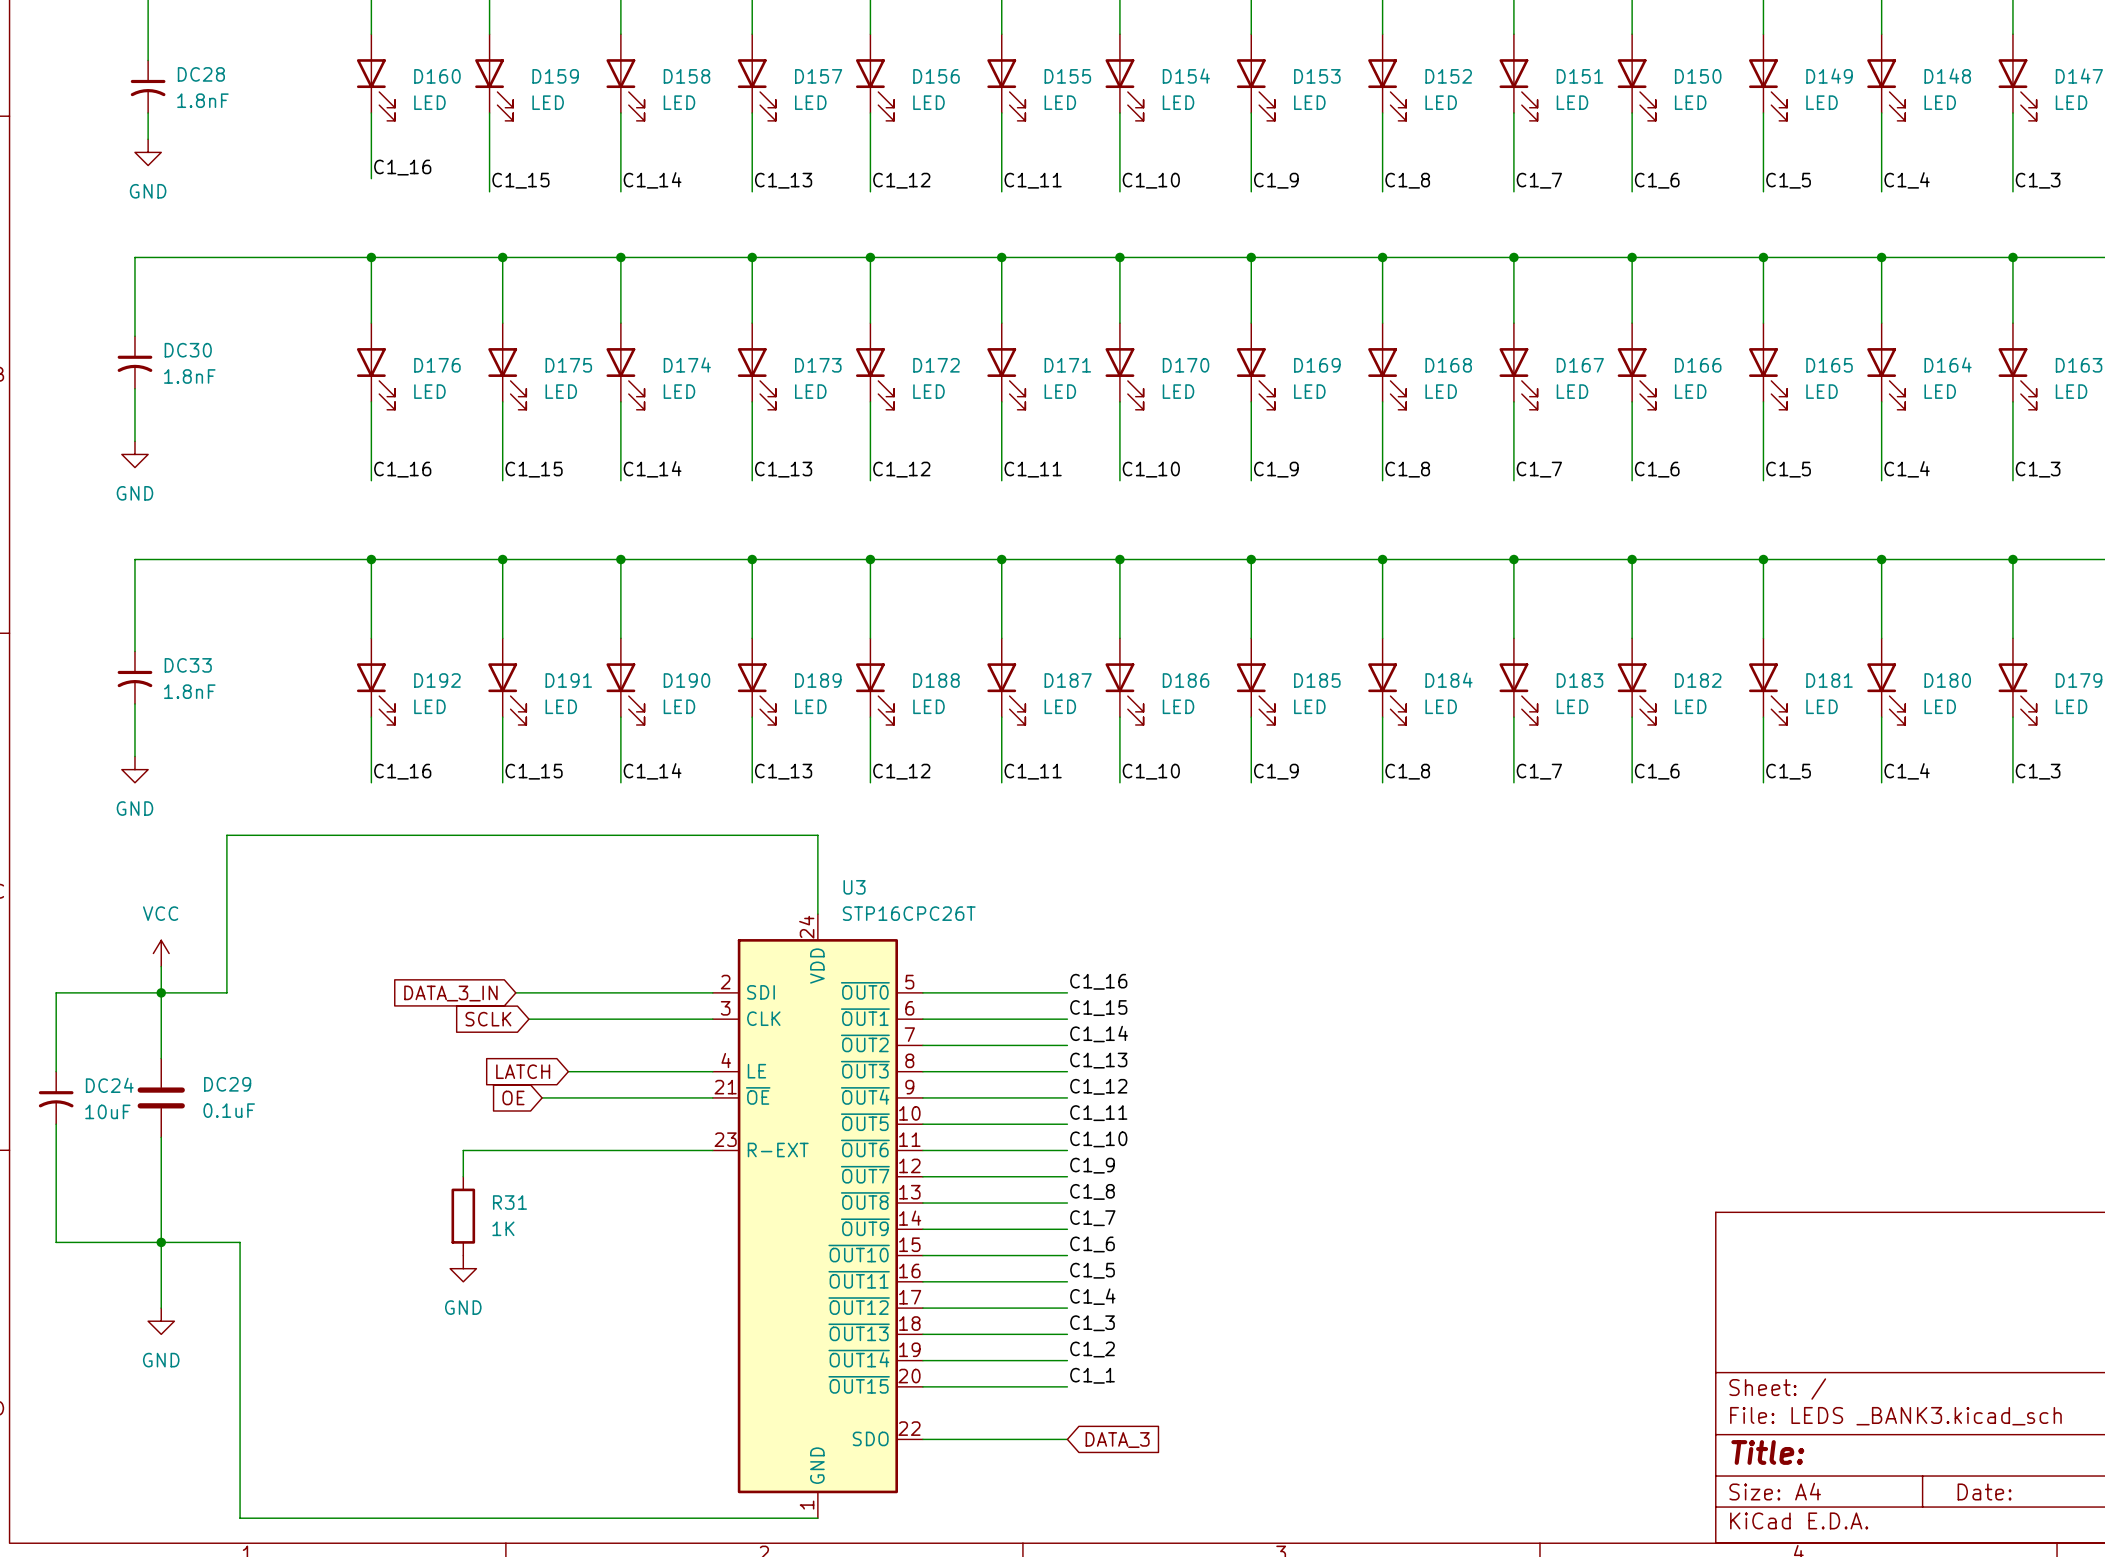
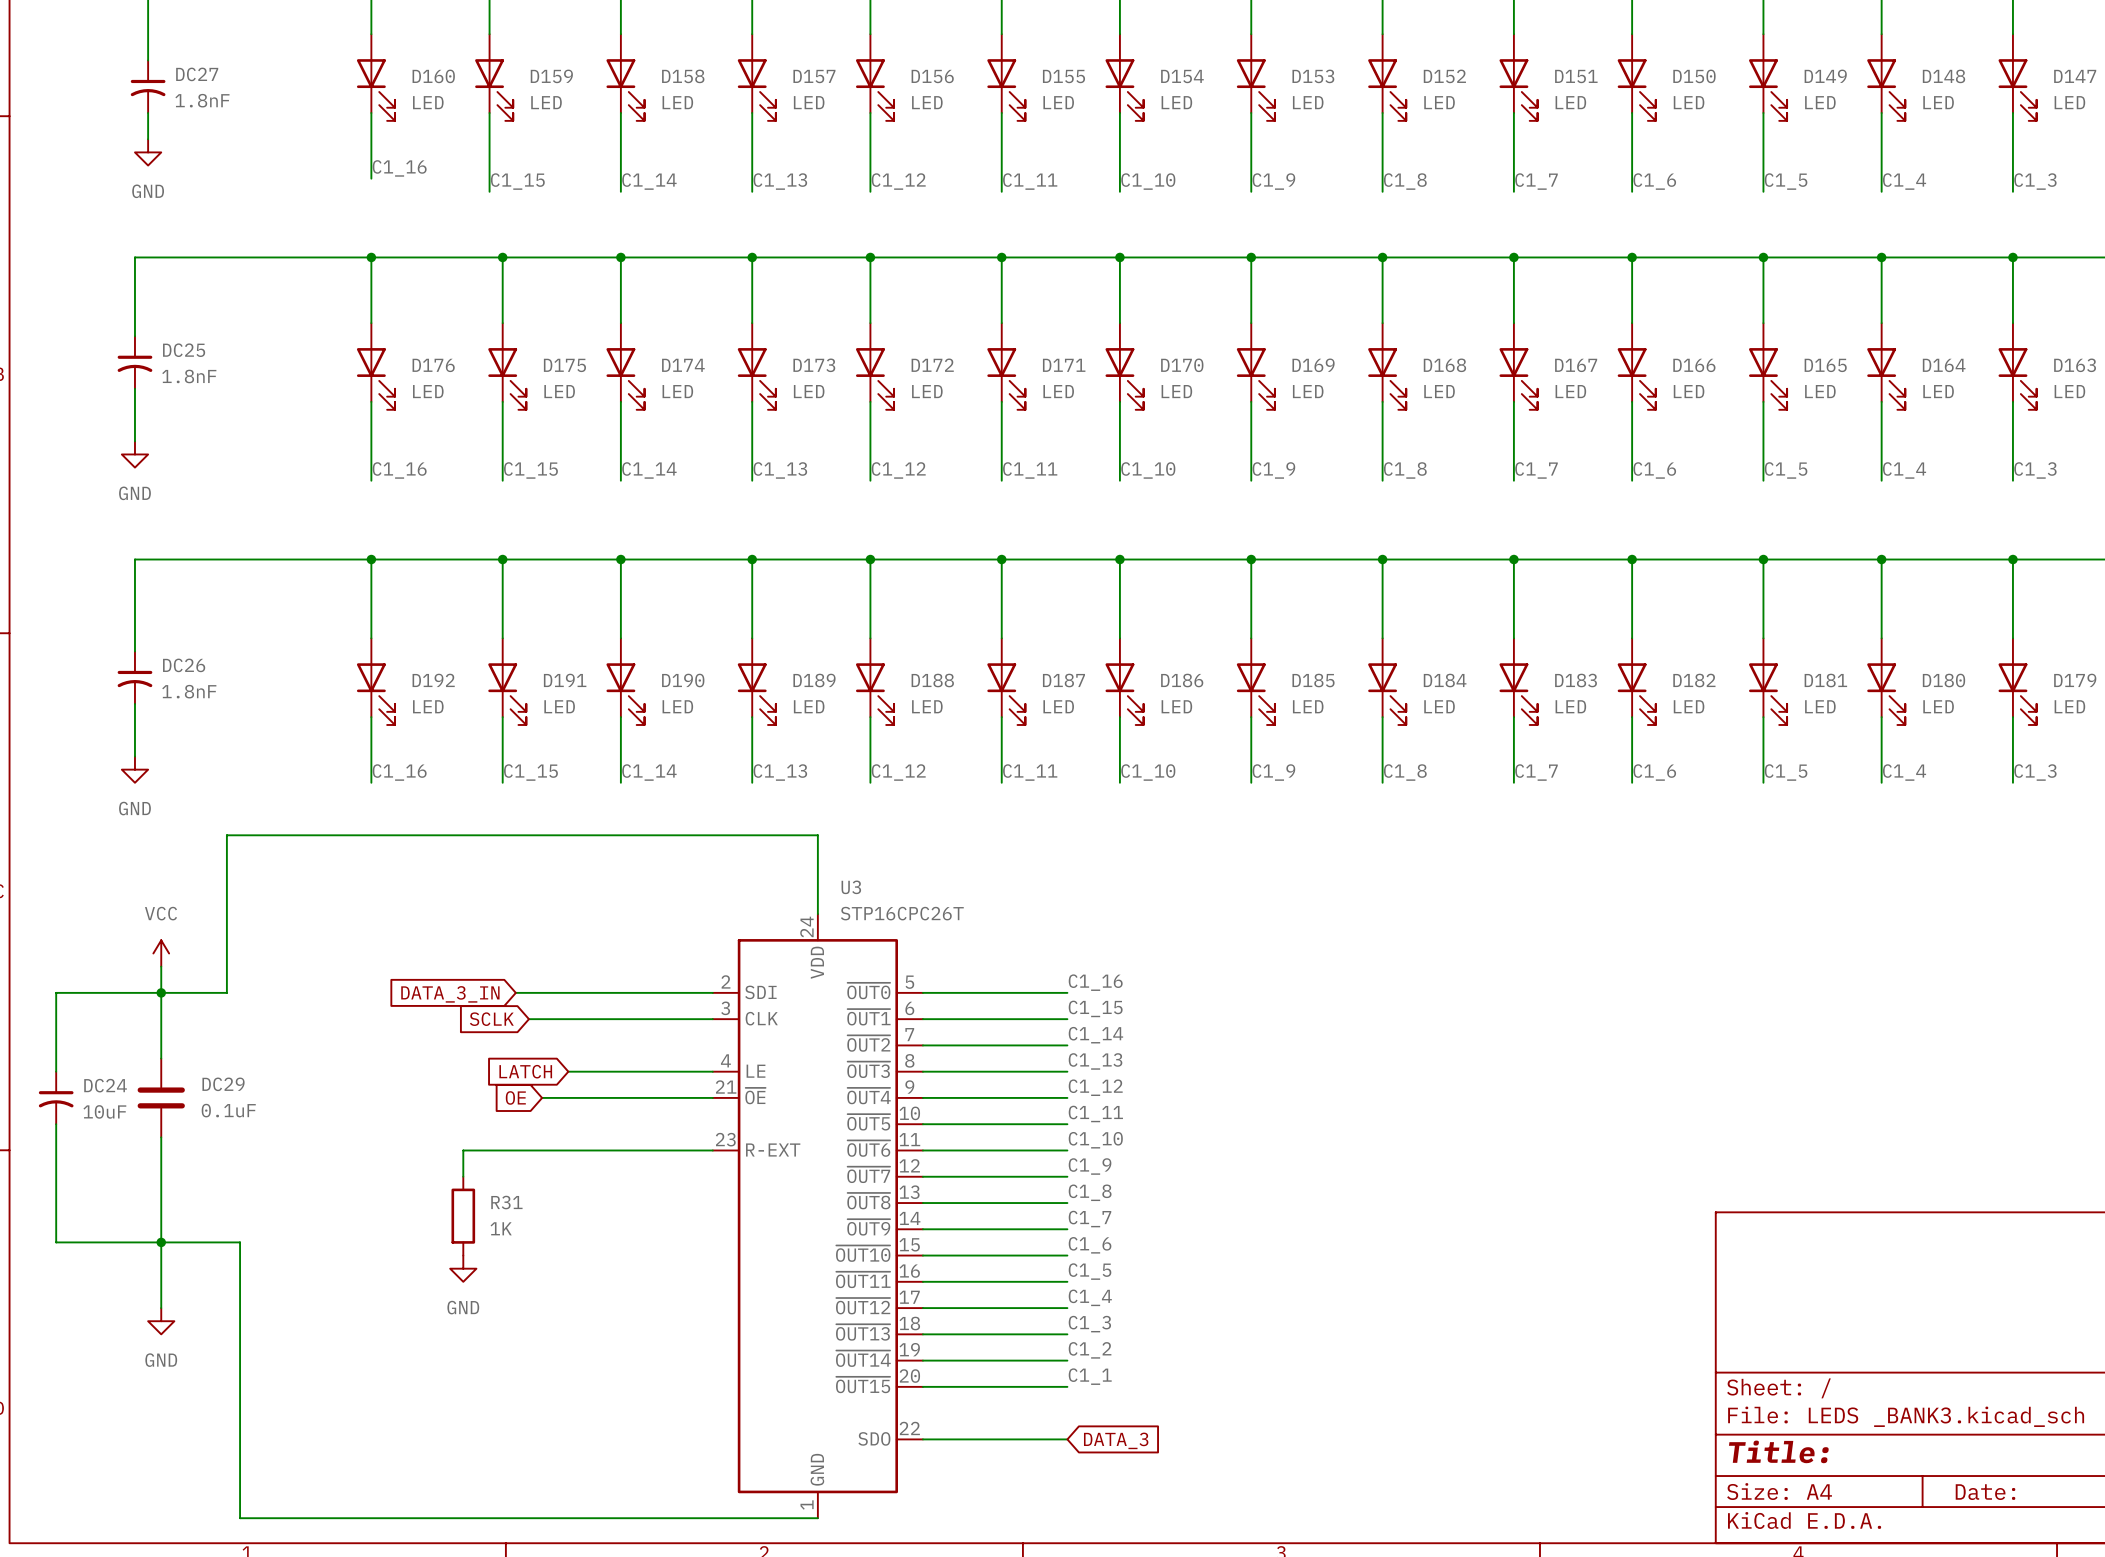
DC28 name: DC28 (201, 74) -> DC27 (197, 74)
DC30 name: DC30 (188, 350) -> DC25 (184, 350)
DC33 name: DC33 (188, 665) -> DC26 (184, 665)

